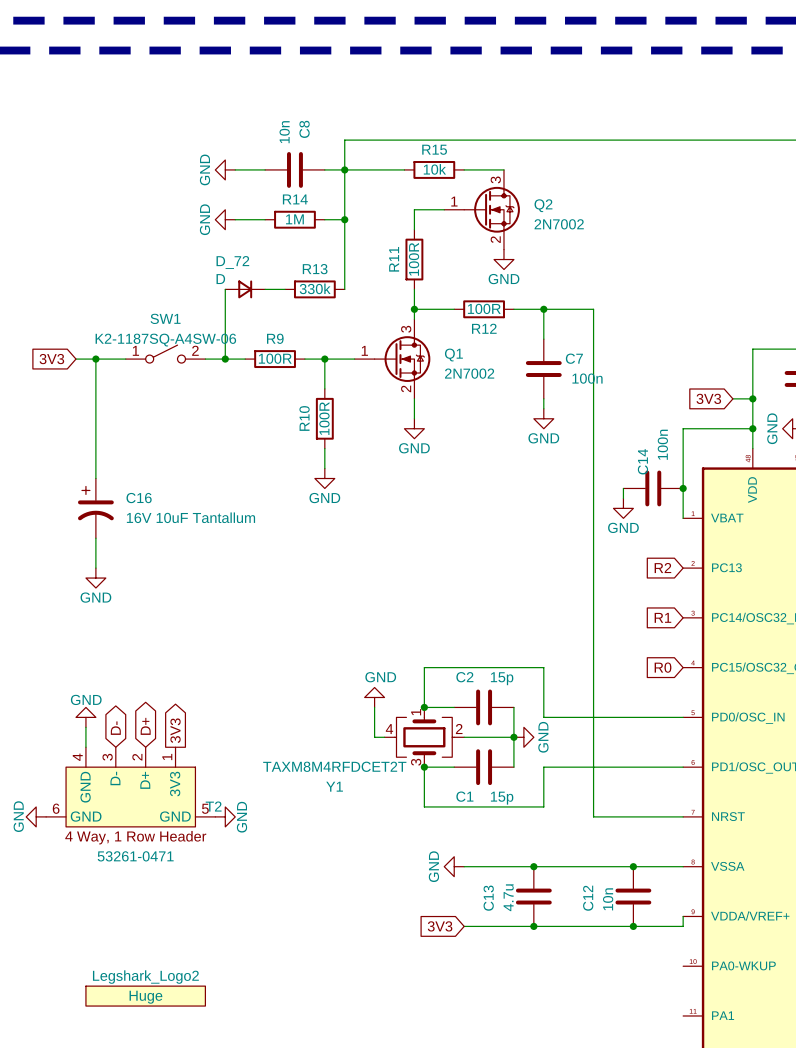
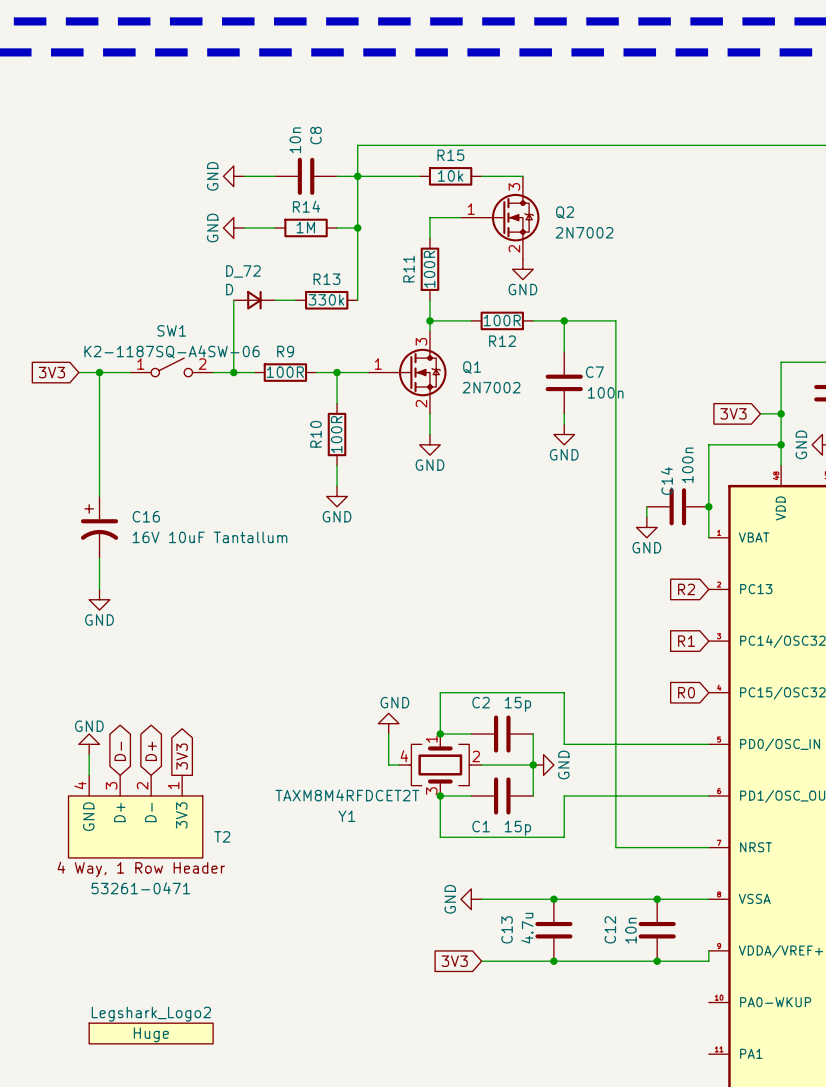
T2 symbol: [46, 747, 216, 827] -> [68, 775, 203, 858]
power symbol: GND (36, 816) -> none
power symbol: GND (225, 816) -> none

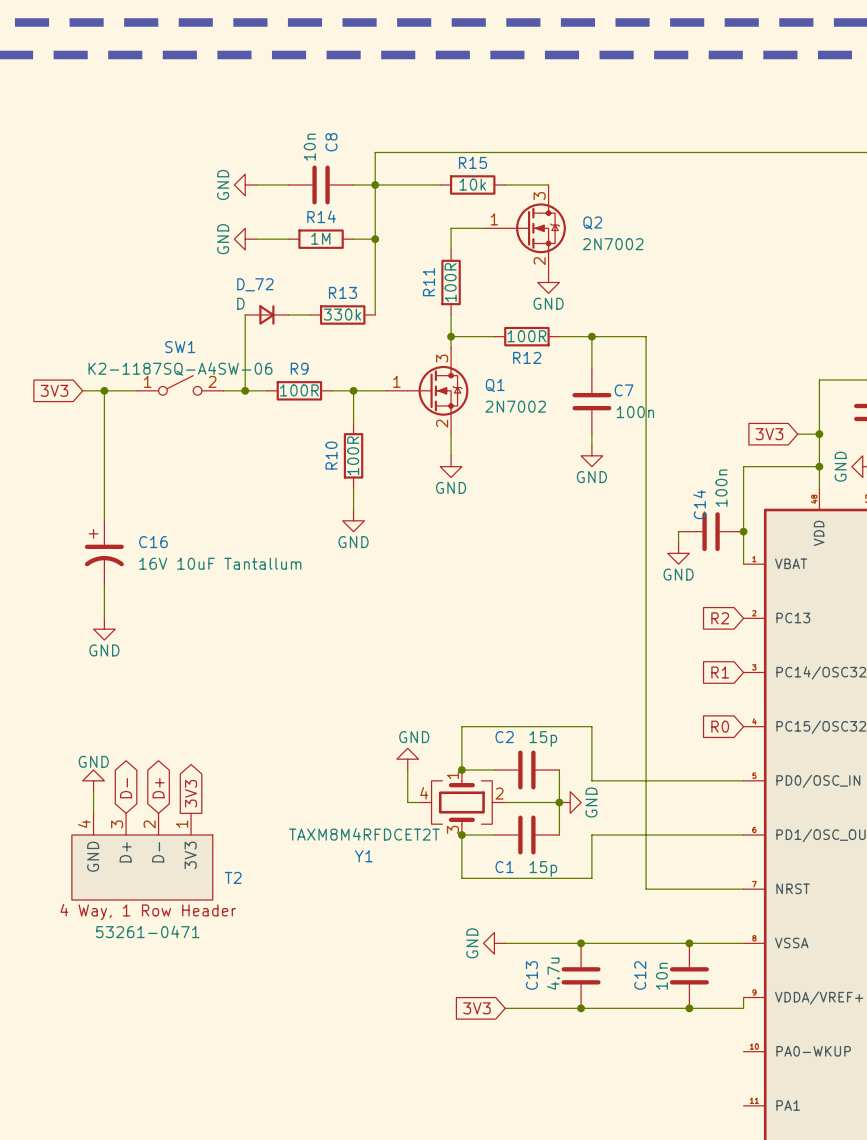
Legshark_Logo2: Huge (151, 1033) -> none

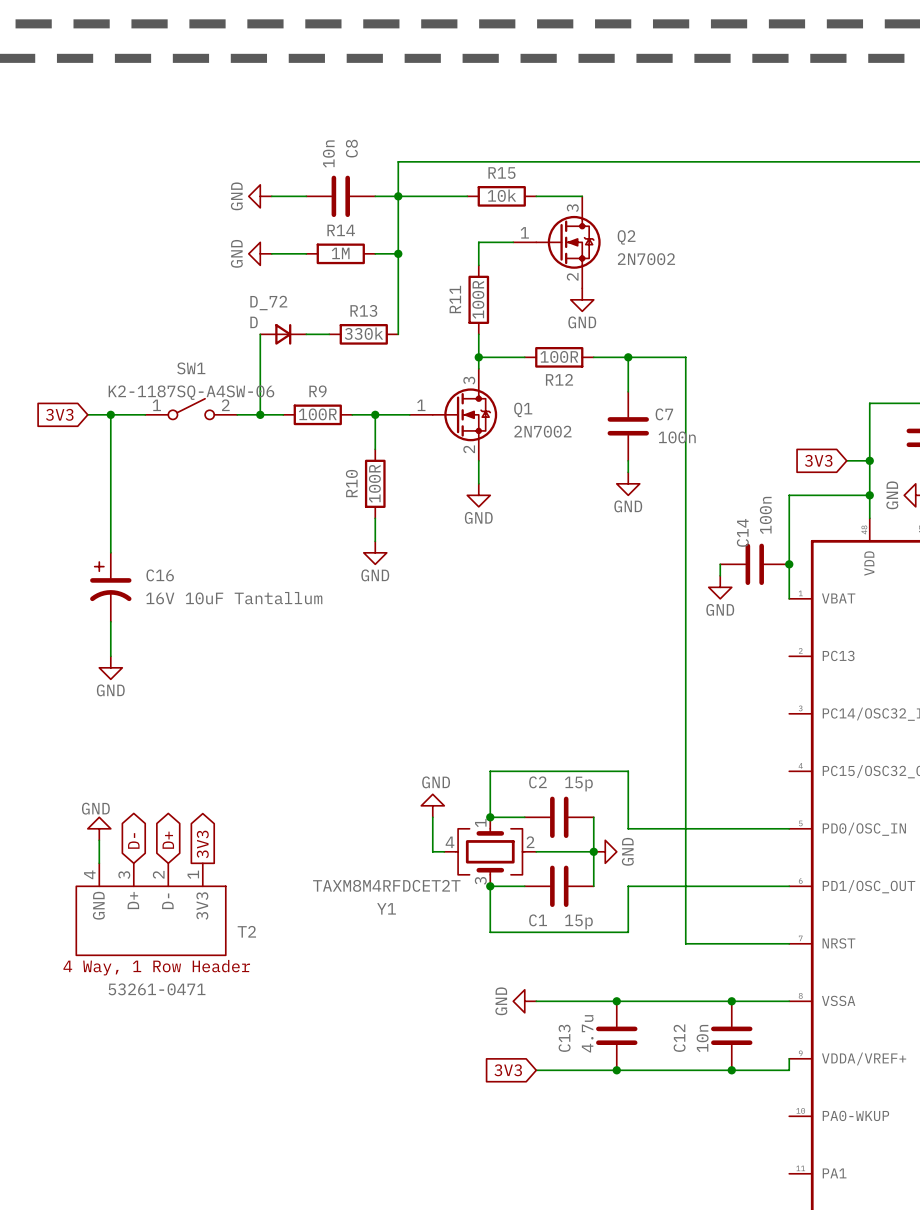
global label: R2 (720, 618) -> none
global label: R1 (720, 672) -> none
global label: R0 (720, 726) -> none

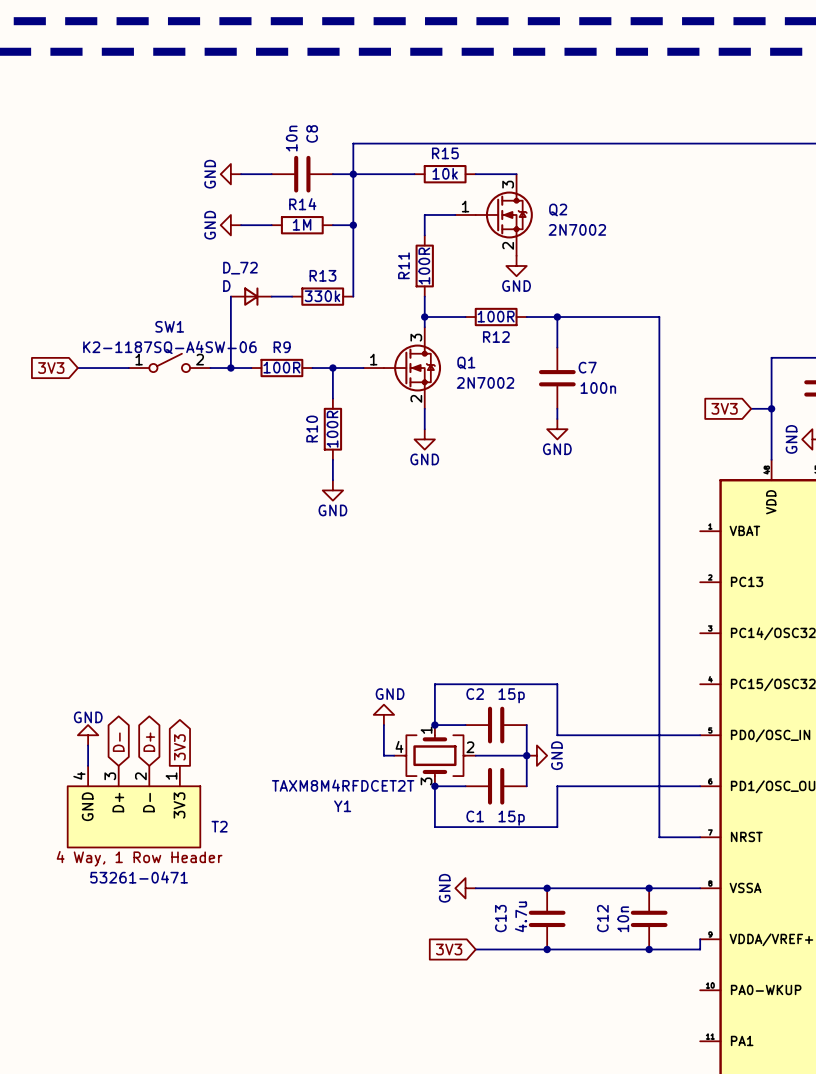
wire: (685, 357) (685, 943) (743, 943) -> (608, 317) (659, 317) (659, 837)
wire: (110, 414) (110, 552) -> none
junction: (110, 414) -> none
wire: (869, 495) (789, 495) (789, 598) -> none
junction: (869, 495) -> none
wire: (720, 564) (720, 575) -> none
C14: 100n (754, 564) -> none
junction: (789, 564) -> none
C16: 16V 10uF Tantallum (110, 587) -> none
power symbol: GND (720, 587) -> none
wire: (110, 621) (110, 656) -> none
power symbol: GND (110, 667) -> none

